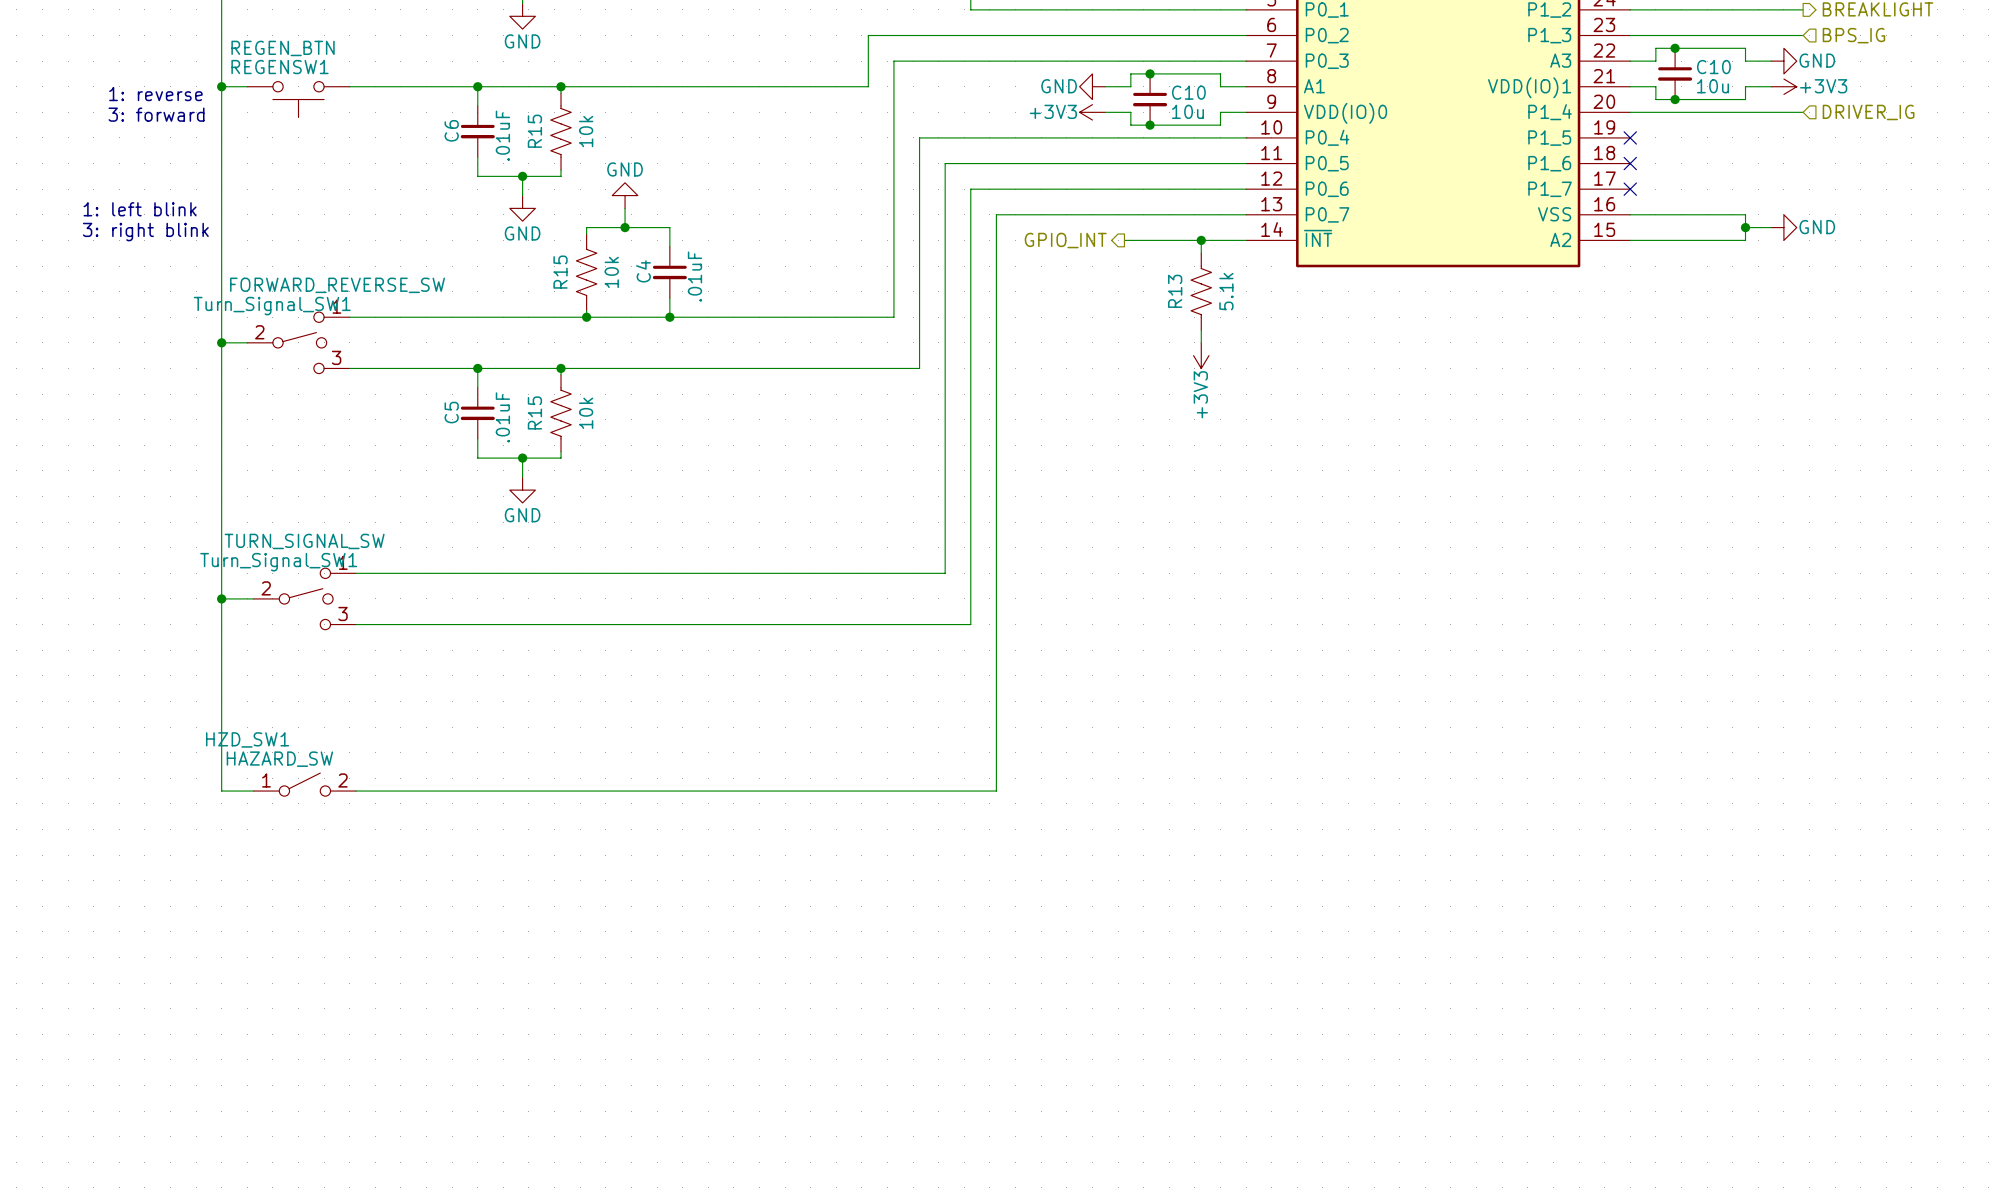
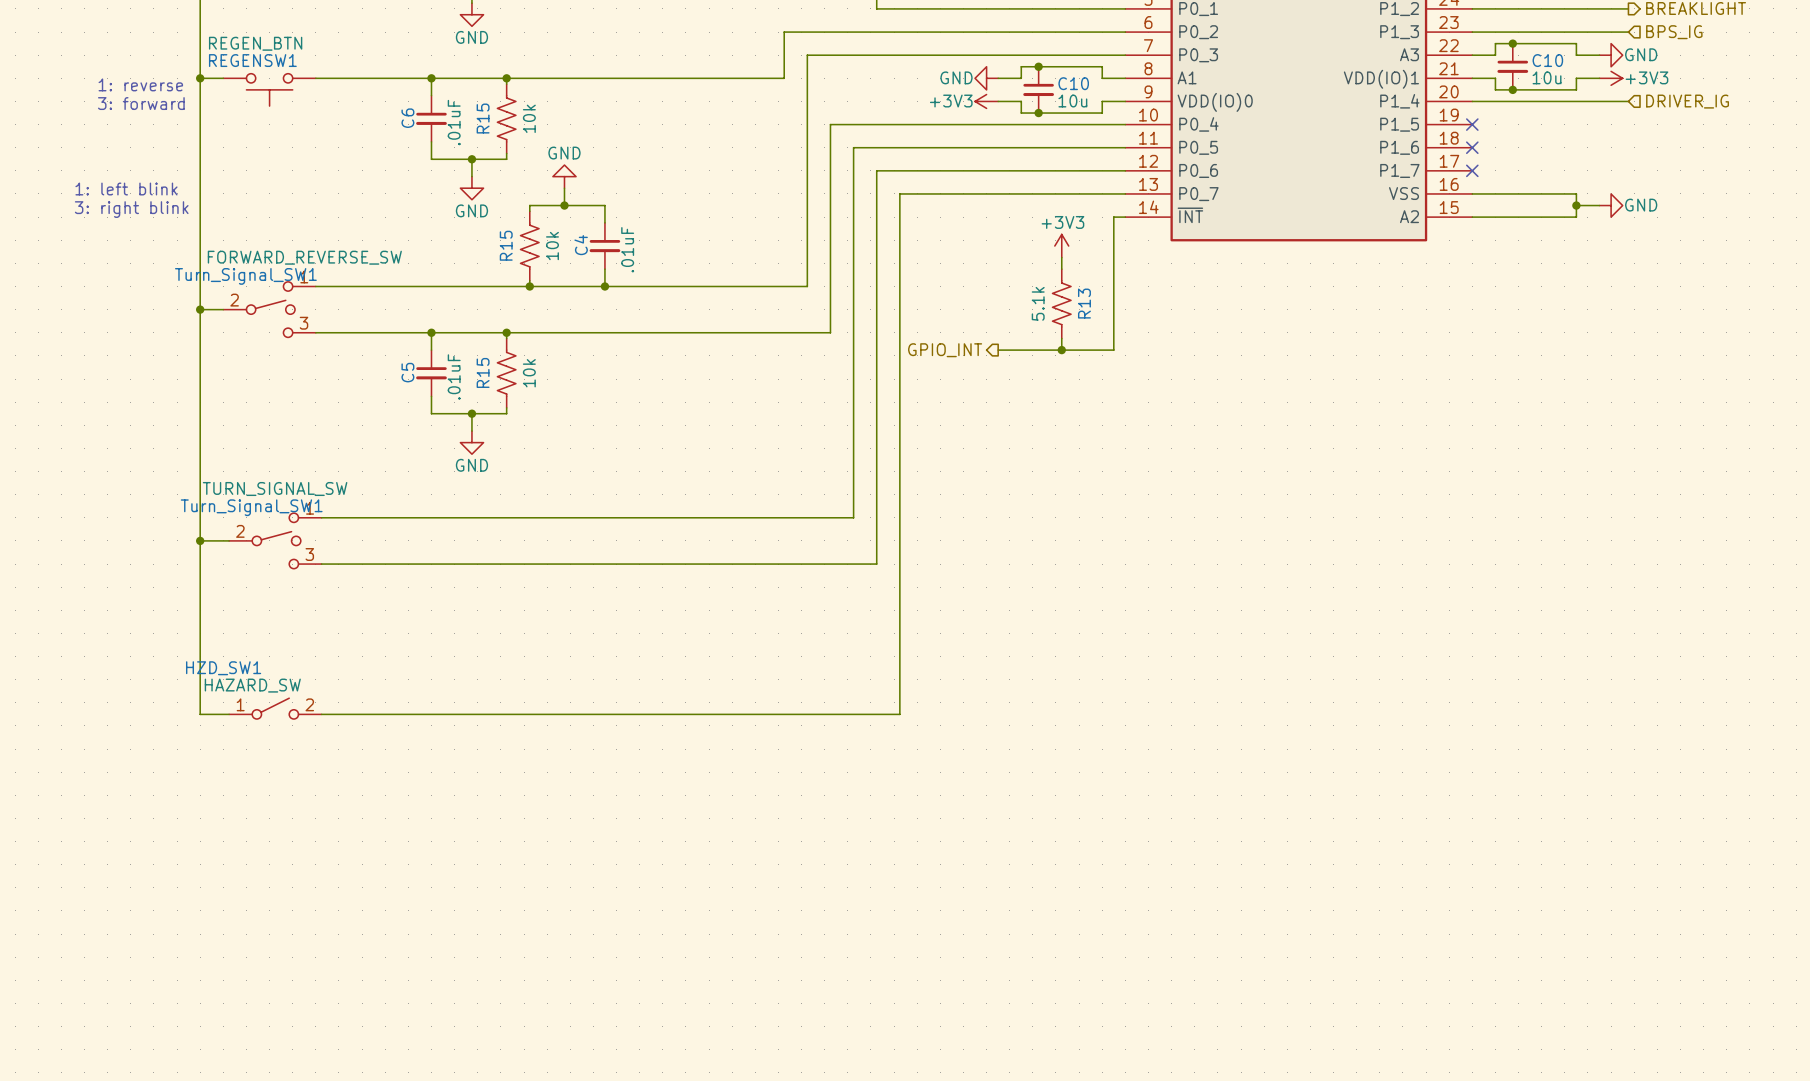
hierarchical label position: GPIO_INT (1065, 240) -> GPIO_INT (945, 350)
wire: (1124, 240) (1233, 240) -> (998, 350) (1113, 350) (1113, 217)
wire: (1201, 240) (1201, 253) -> (1061, 257) (1061, 269)
junction: (1201, 240) -> none
R13 name position: R13 (1175, 291) -> R13 (1084, 303)
R13 position: (1201, 291) -> (1061, 303)
R13 value position: 5.1k (1226, 291) -> 5.1k (1038, 303)
wire: (1201, 330) (1201, 342) -> (1061, 338) (1061, 350)
power symbol rotation: 0° (1201, 355) -> 180° (1061, 246)
power symbol position: +3V3 (1201, 355) -> +3V3 (1061, 246)
junction: none -> (1061, 350)

